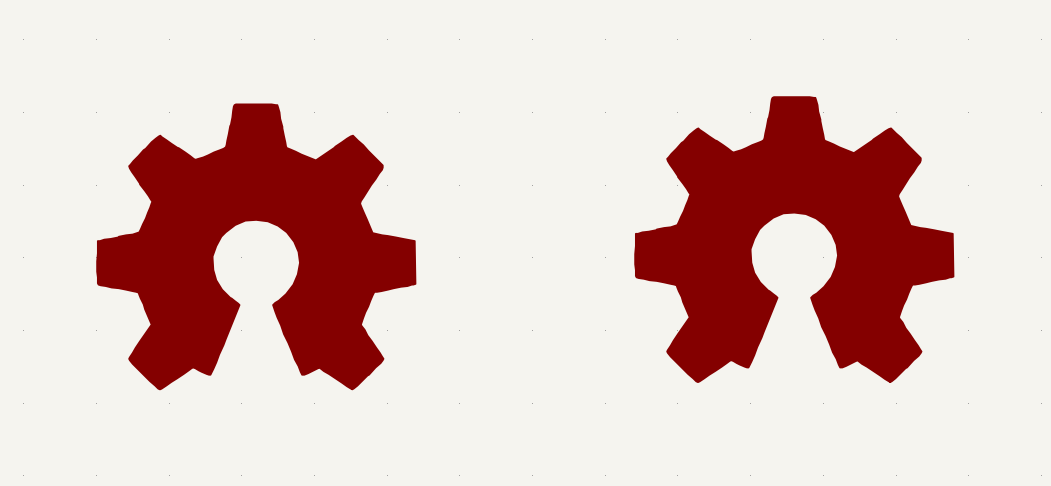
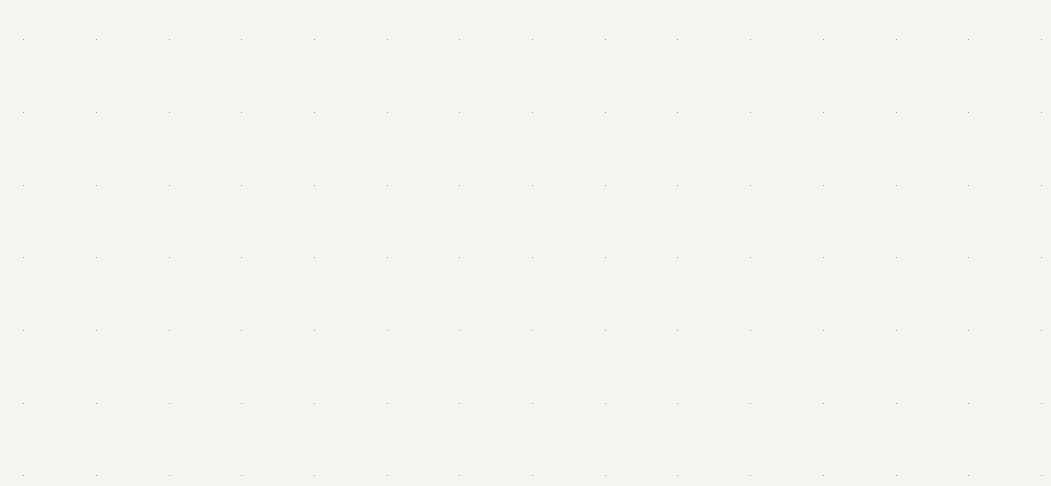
part: (794, 239) -> none
part: (256, 246) -> none

